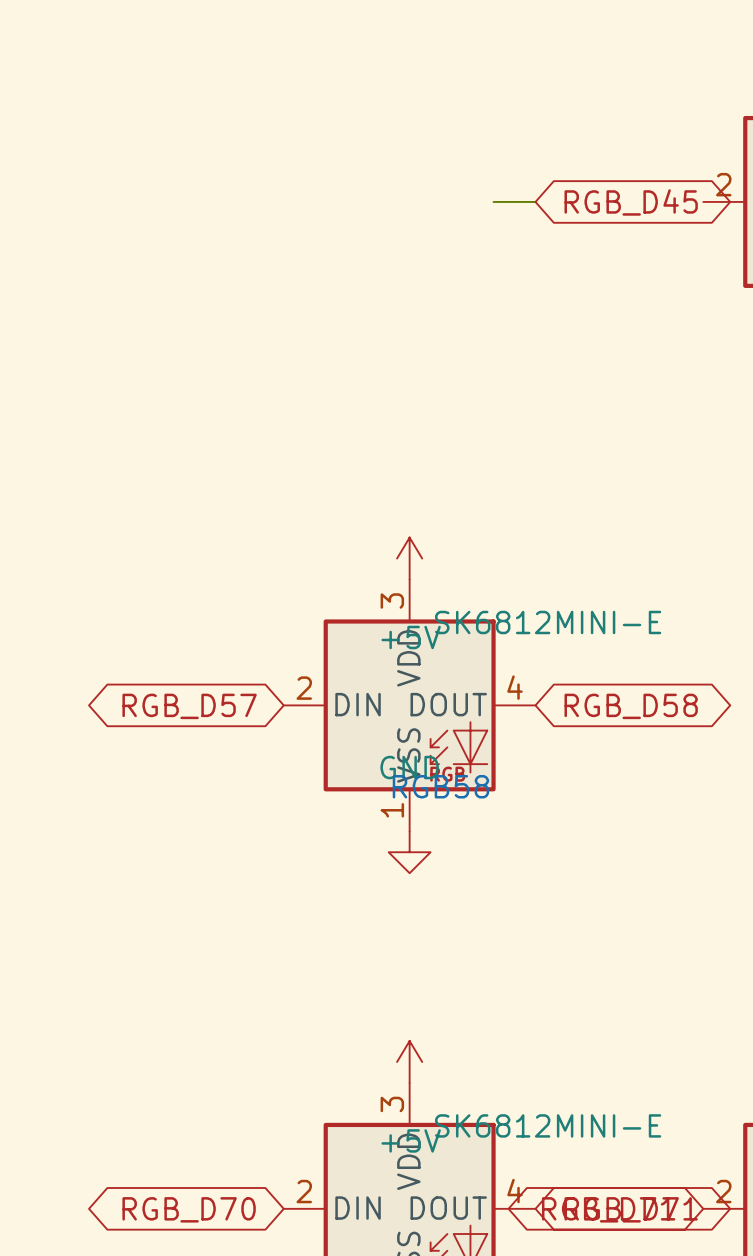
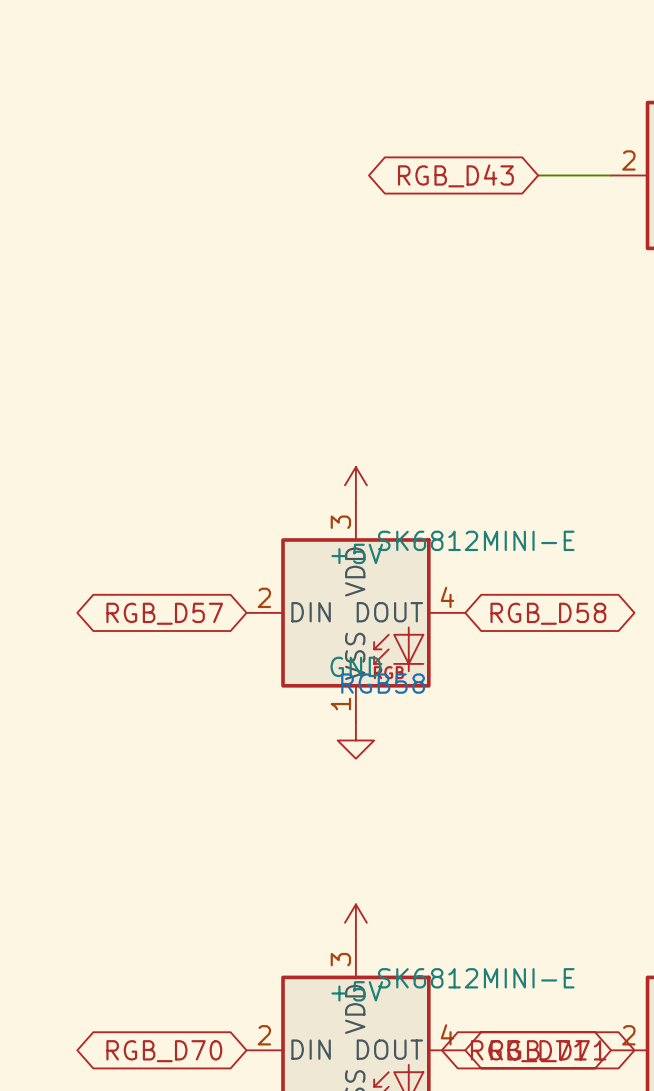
wire: (493, 201) (535, 201) -> none
wire: none -> (538, 175) (611, 175)
global label: RGB_D45 (631, 202) -> RGB_D43 (455, 175)

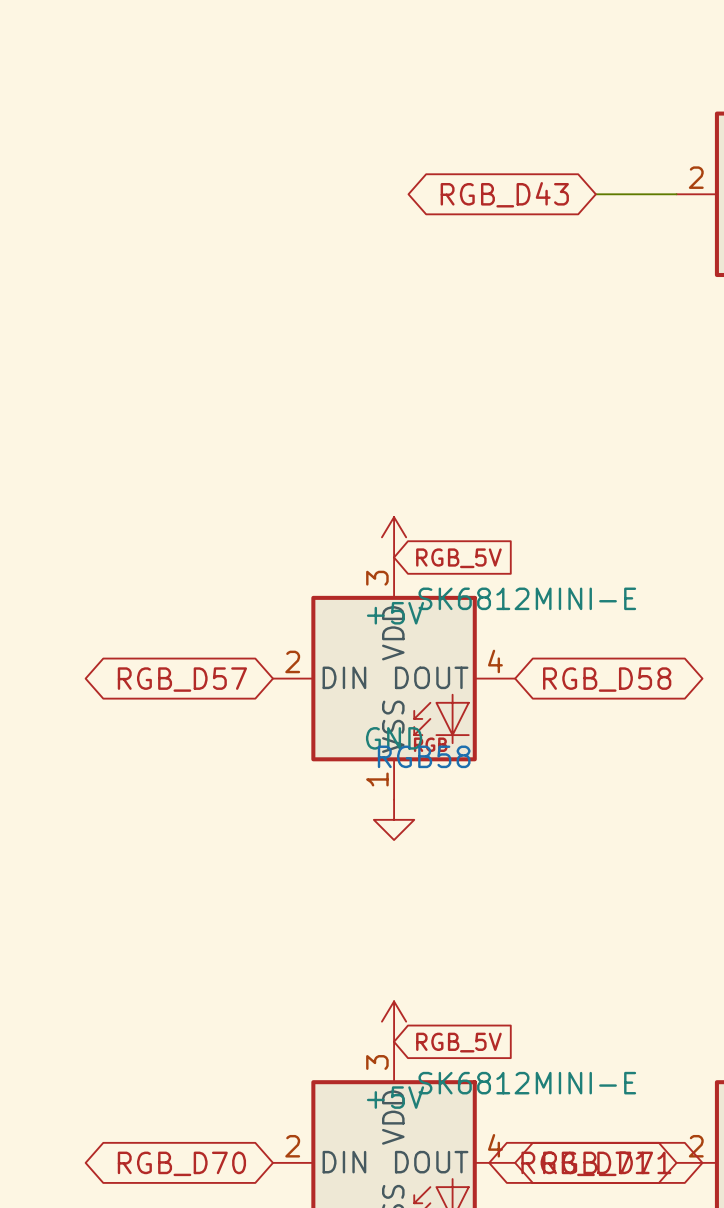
global label: none -> RGB_5V (458, 558)
global label: none -> RGB_5V (458, 1042)

